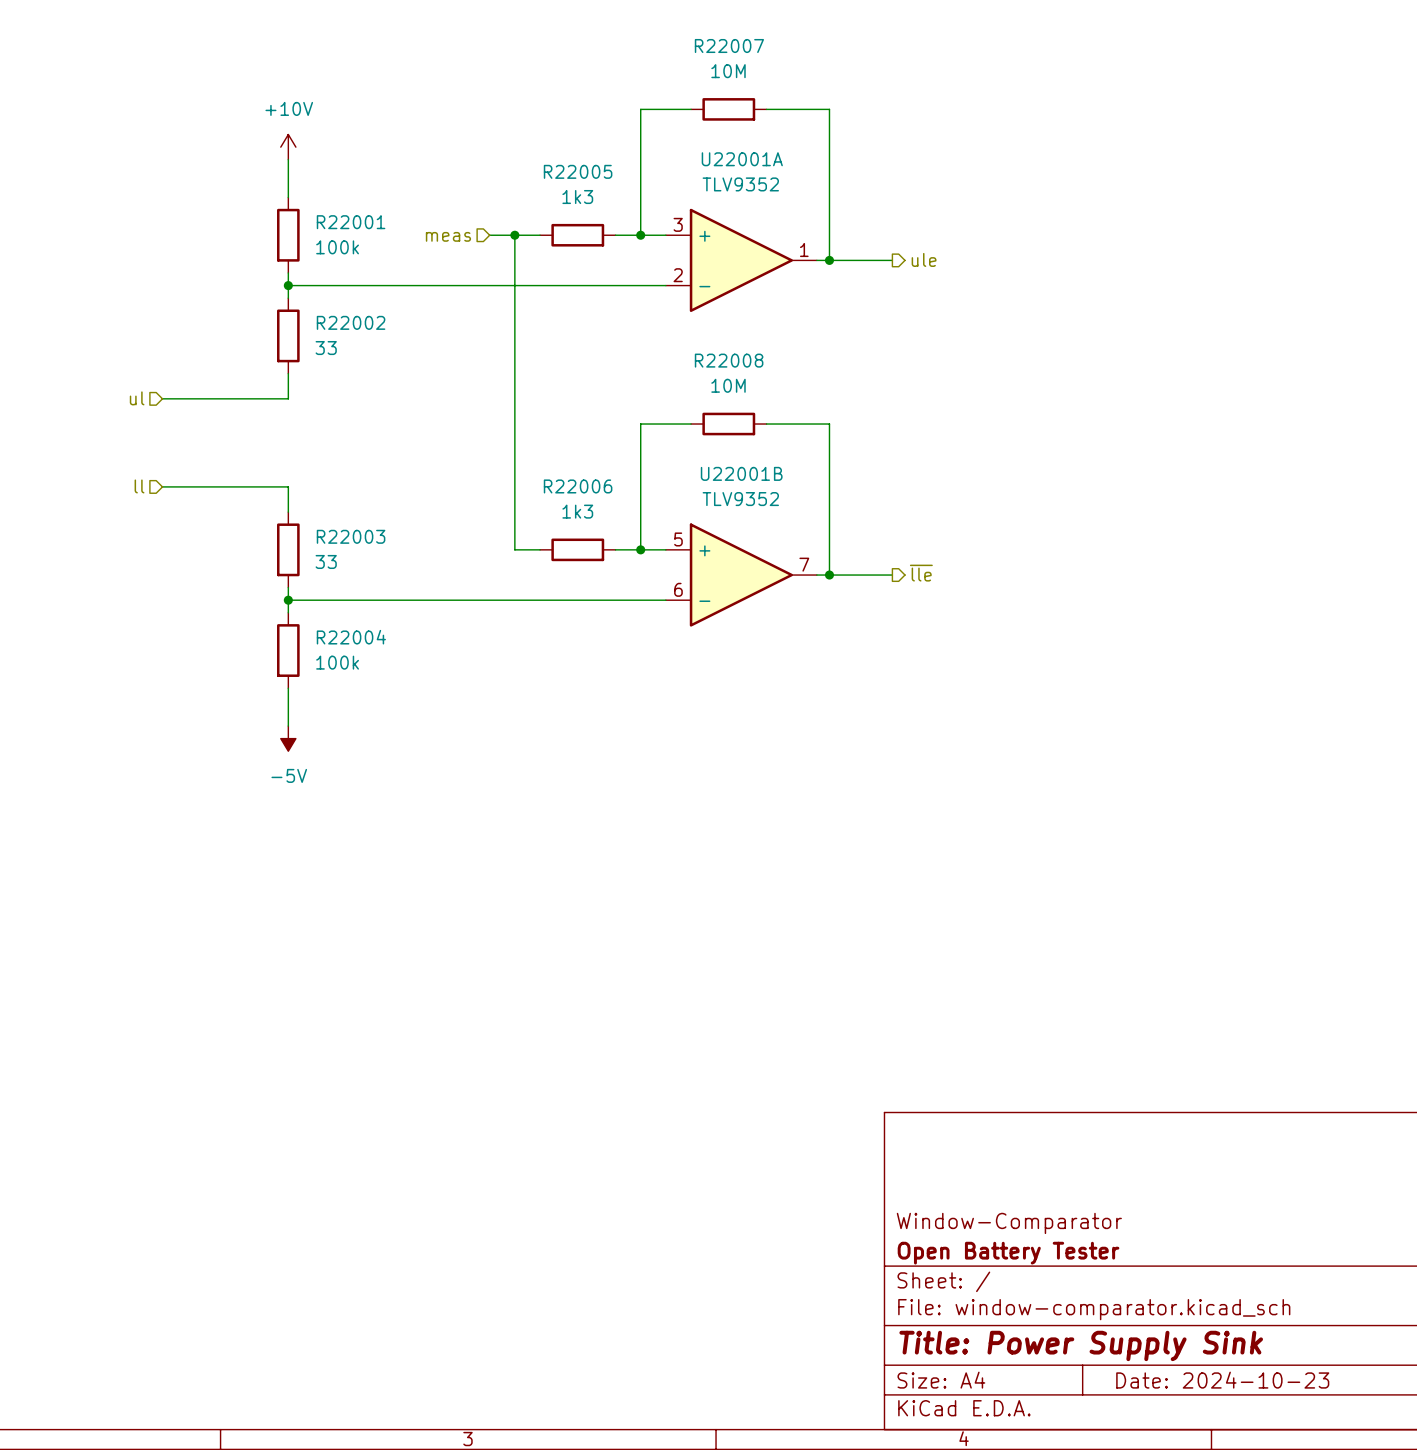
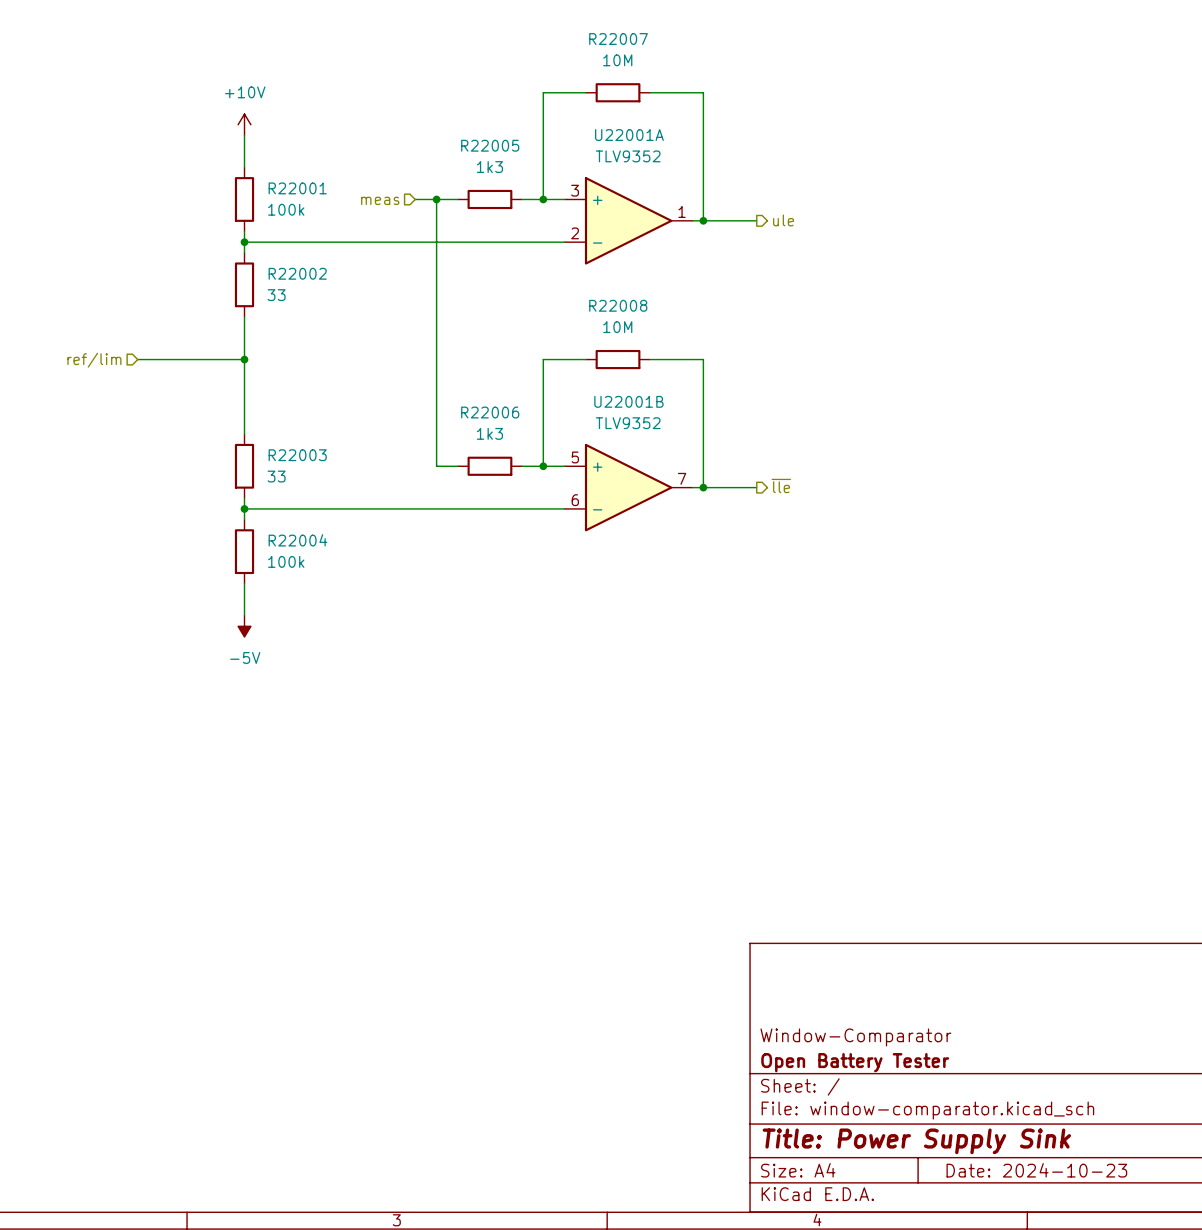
hierarchical label: ul (137, 398) -> none
wire: (162, 398) (288, 398) -> (244, 412) (244, 338)
hierarchical label: none -> ref/lim (94, 360)
junction: none -> (244, 359)
hierarchical label: ll (139, 486) -> none
wire: (162, 486) (288, 486) -> (137, 359) (244, 359)

